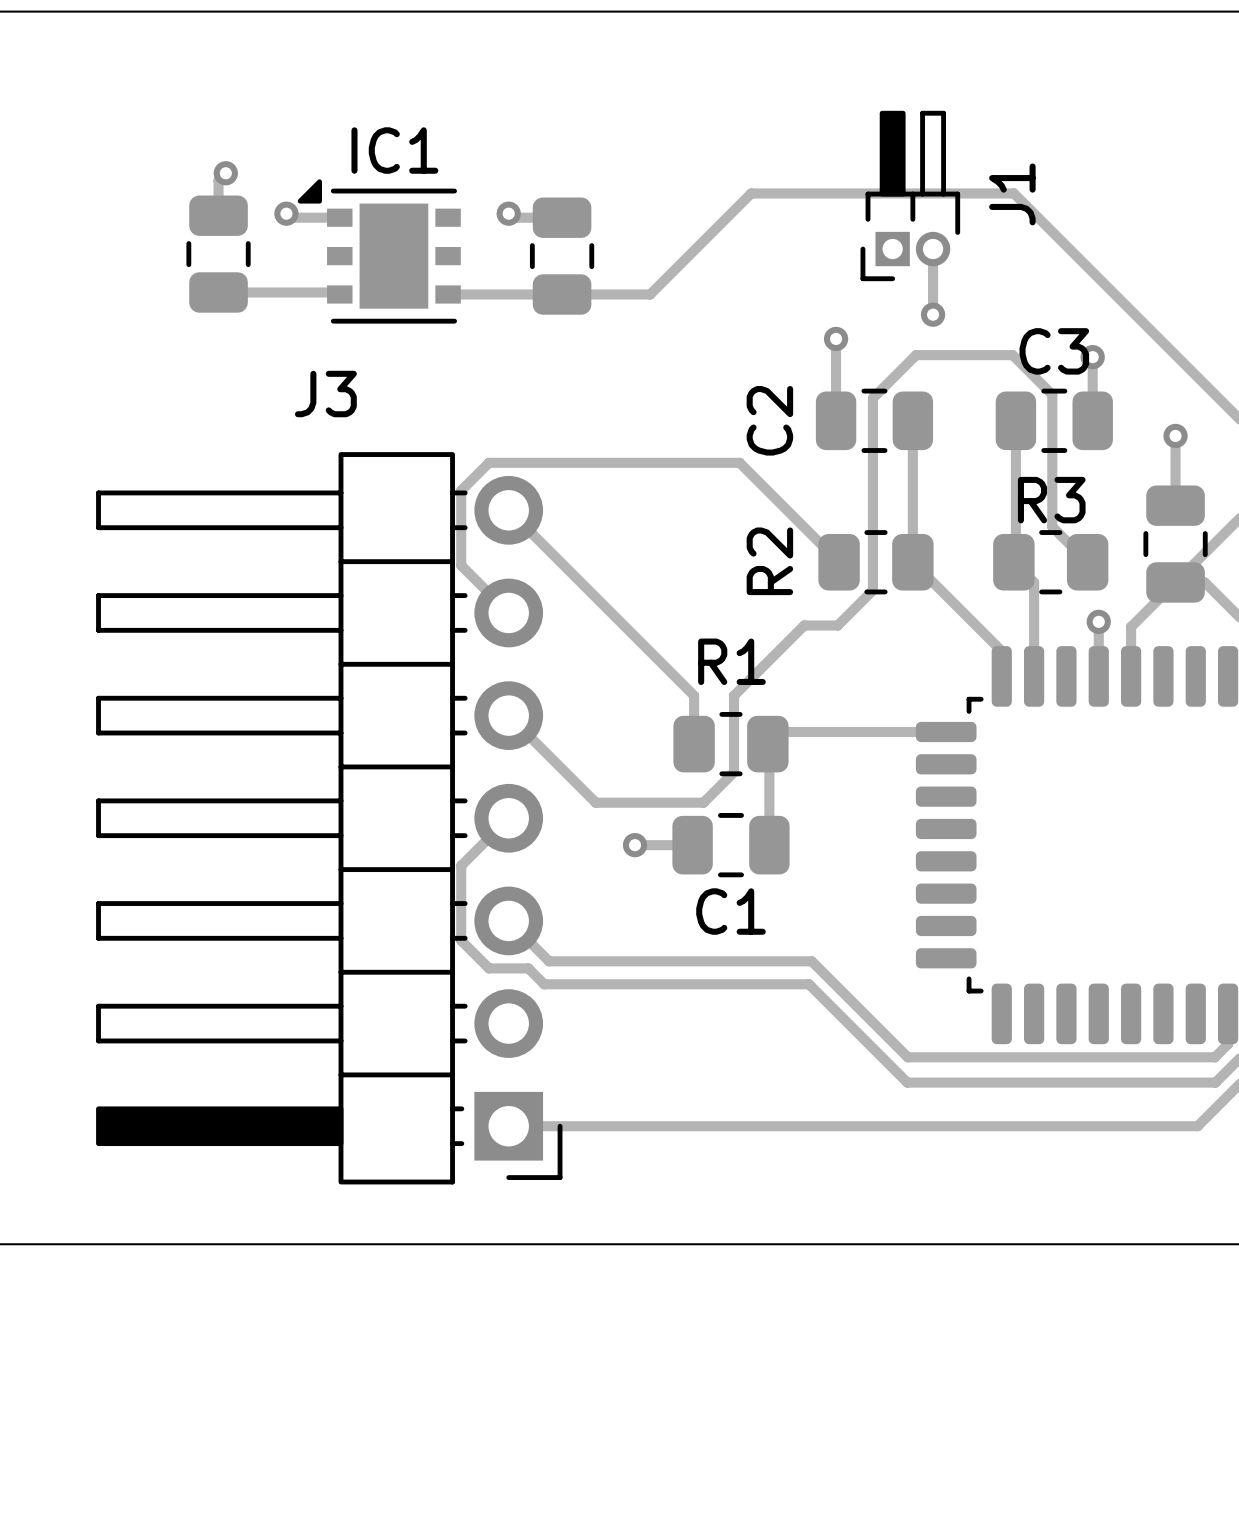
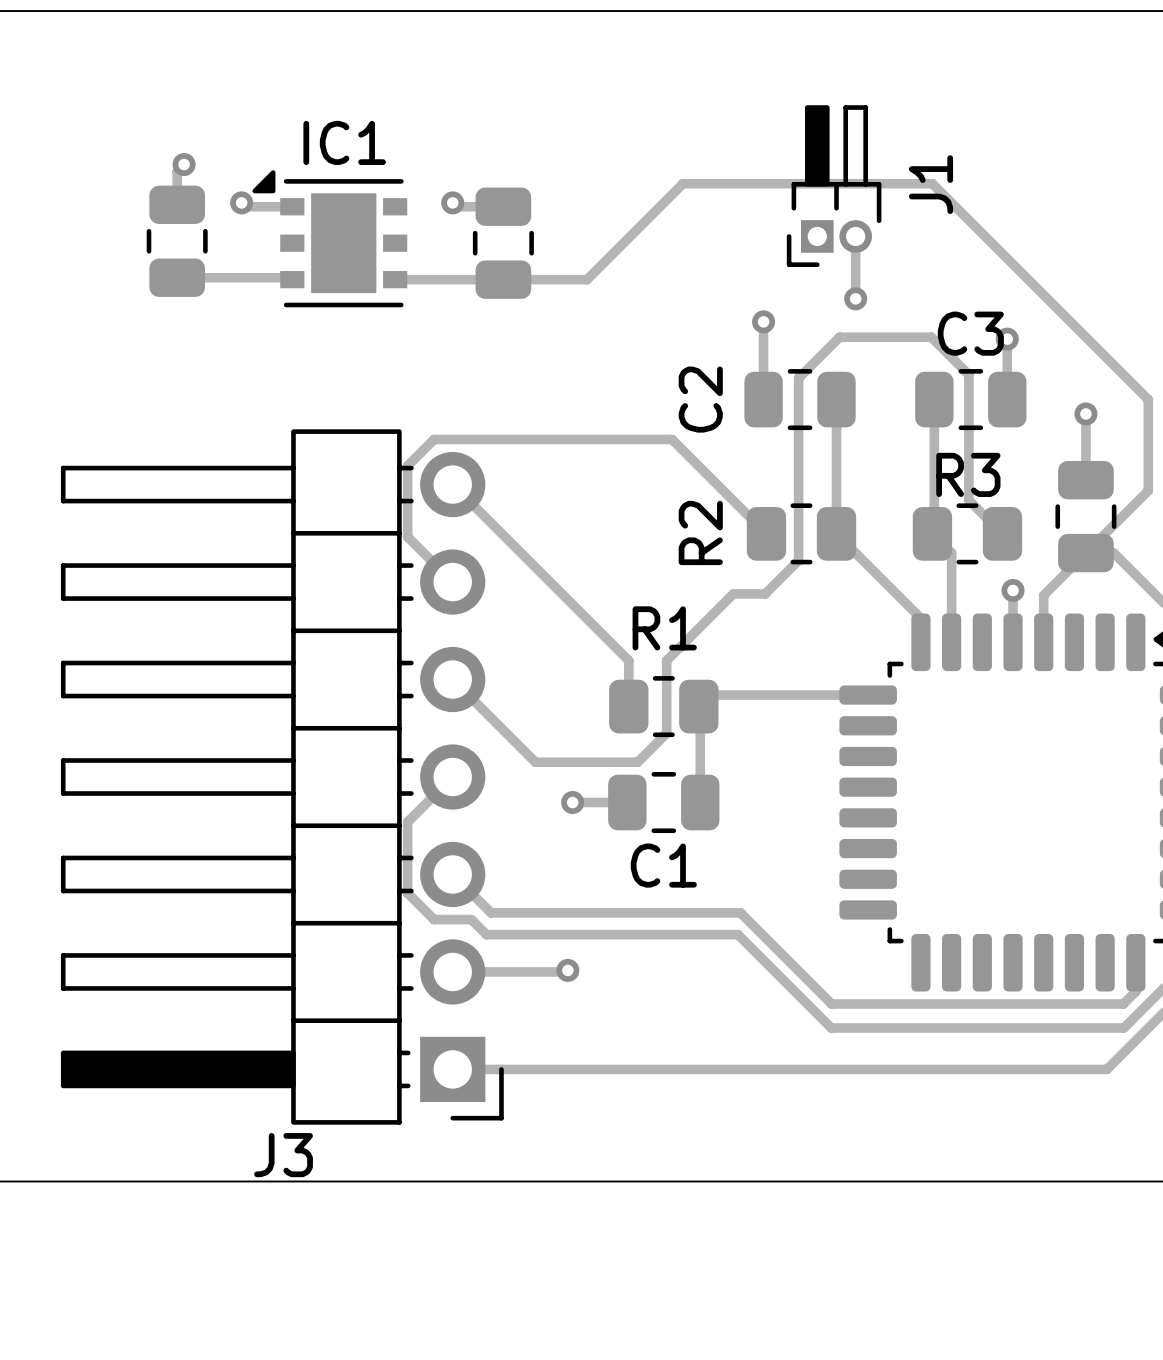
J3 name position: J3 (325, 394) -> J3 (283, 1155)
track: none -> (567, 970) (566, 971) (452, 971)
via: none -> (567, 970)

